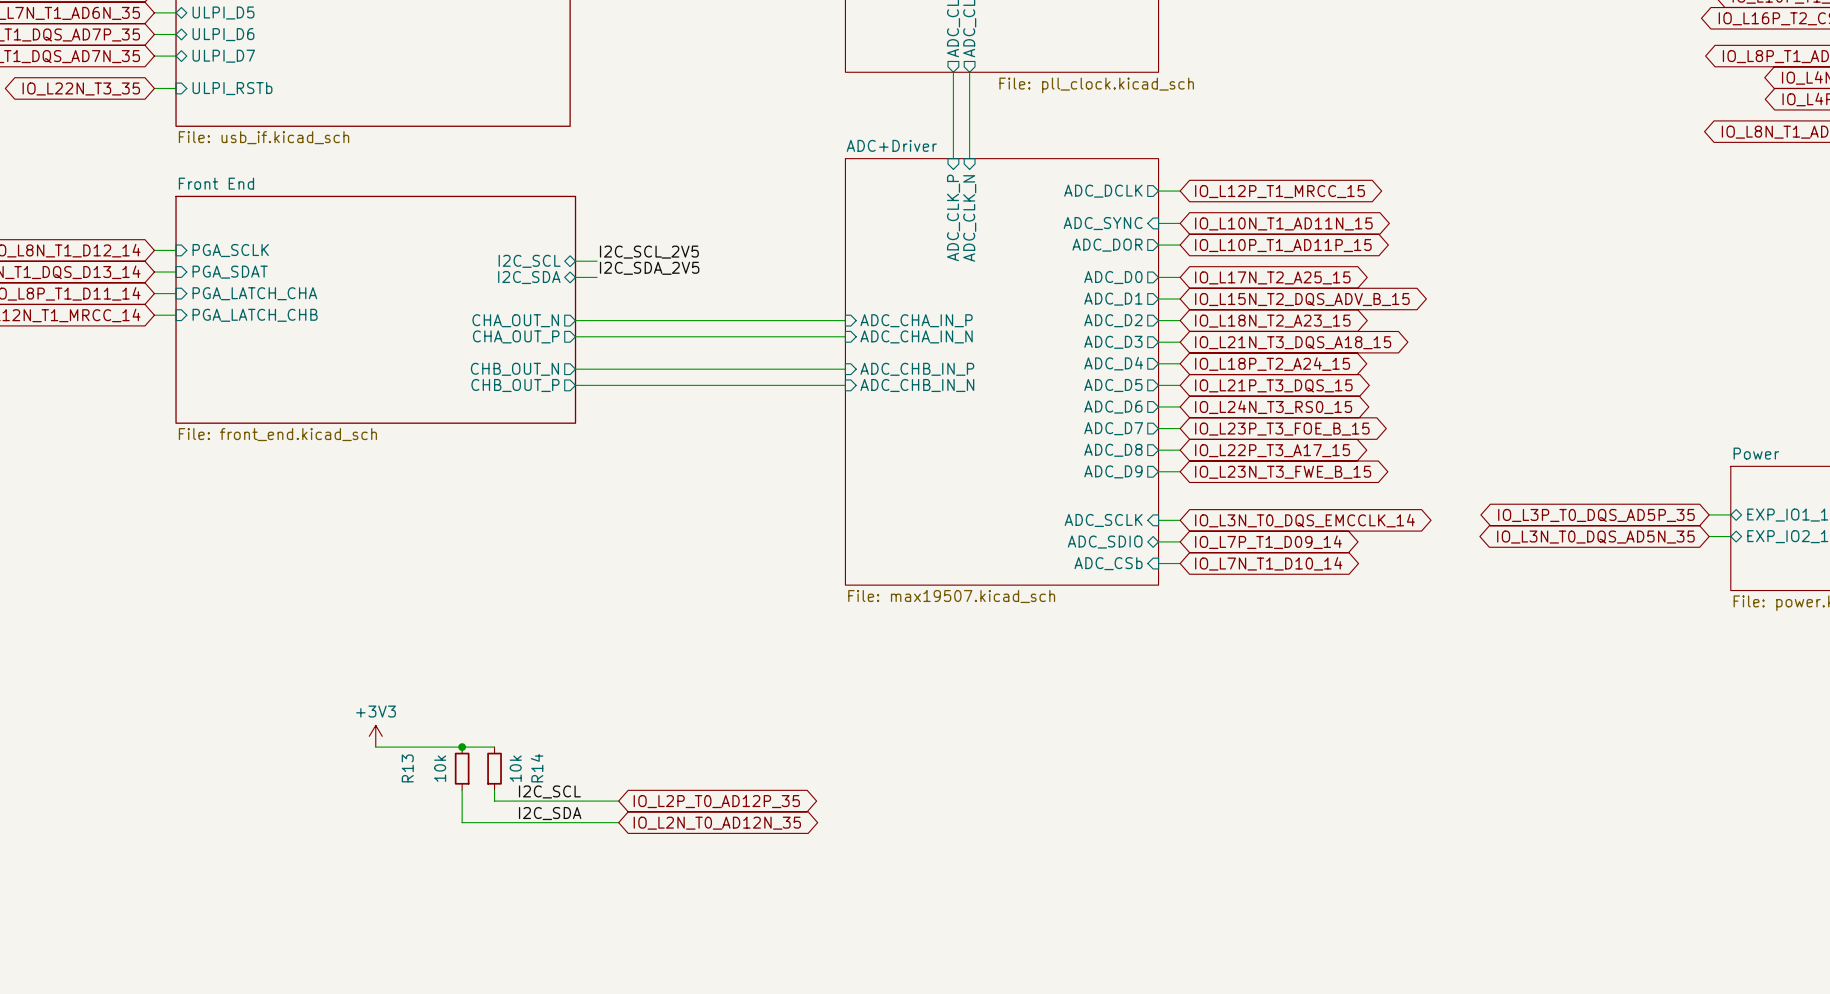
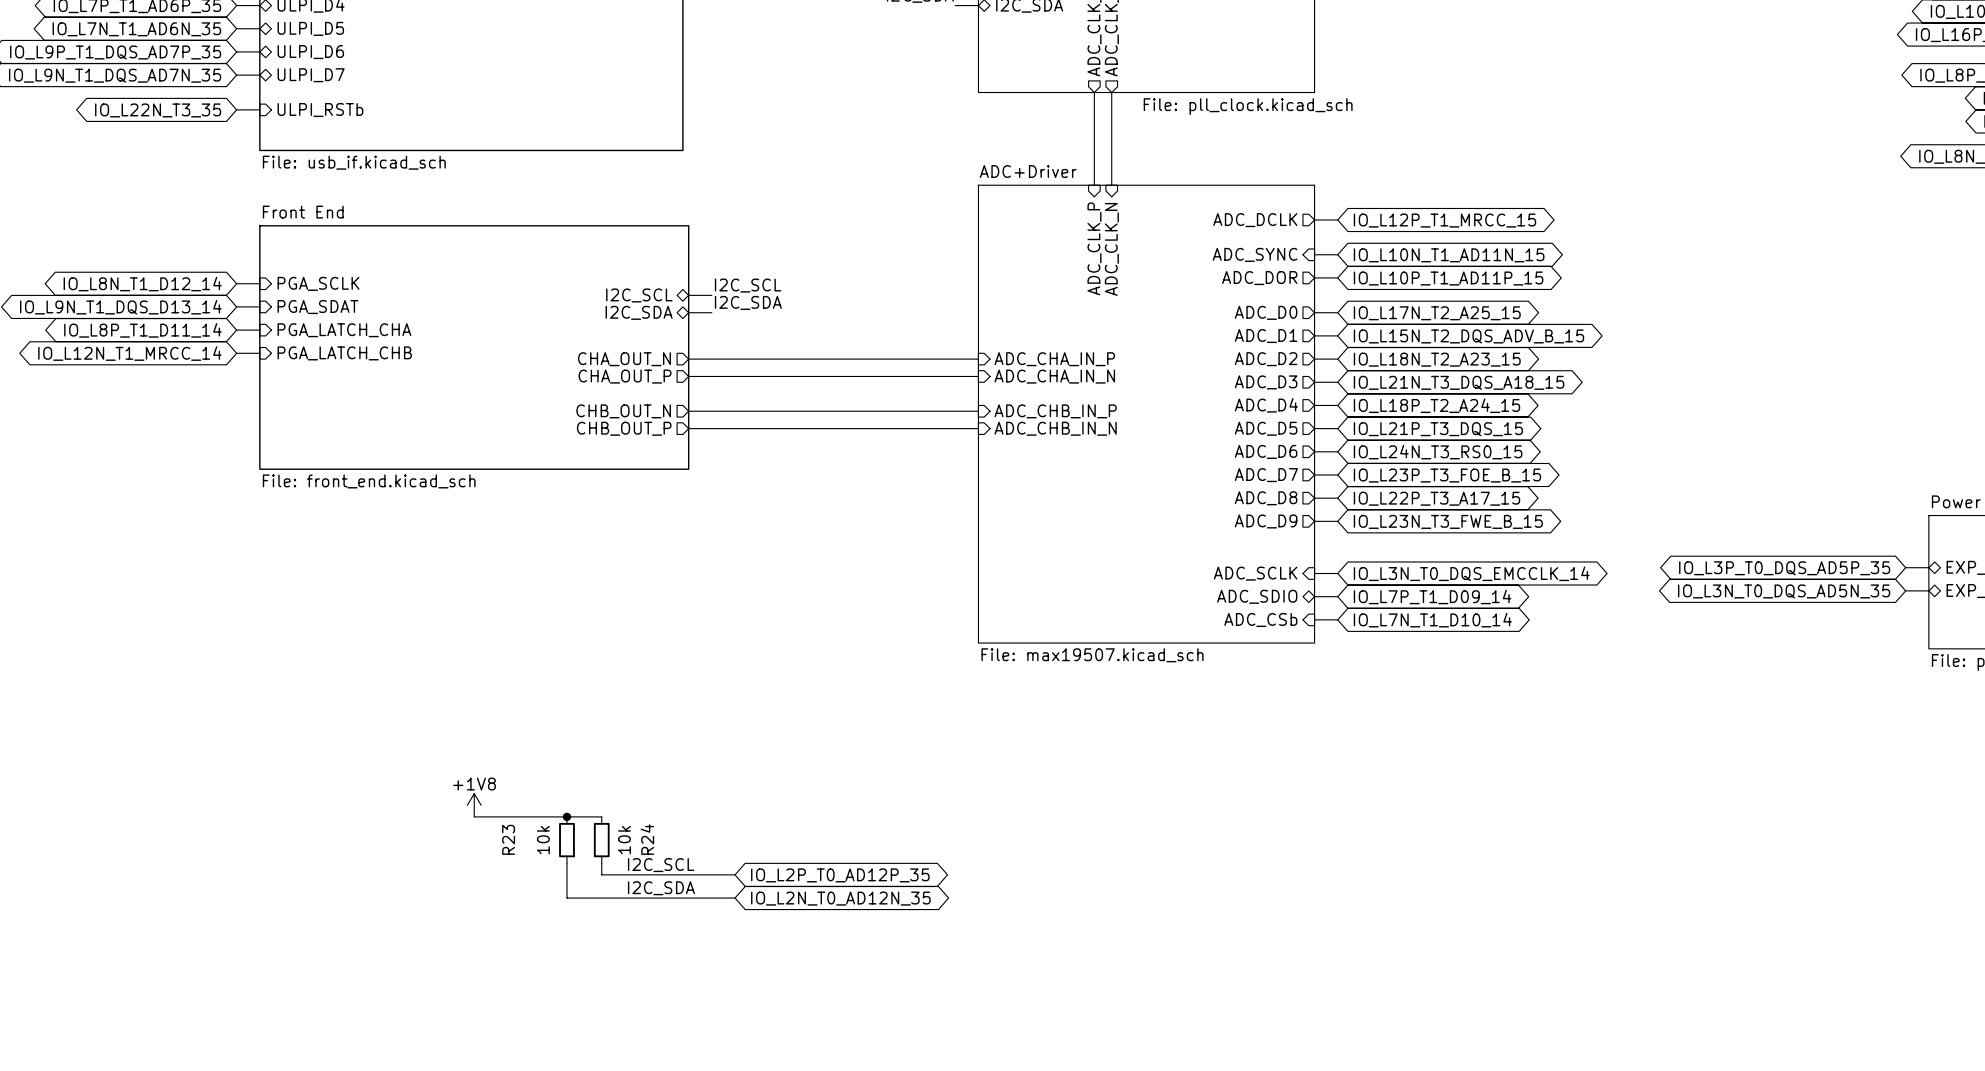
label: I2C_SCL_2V5 (649, 252) -> I2C_SCL (748, 285)
label: I2C_SDA_2V5 (649, 268) -> I2C_SDA (748, 302)
power symbol: +3V3 (375, 736) -> +1V8 (474, 805)
R13 name: R13 (407, 768) -> R23 (508, 839)
R14 name: R14 (537, 768) -> R24 (647, 839)

